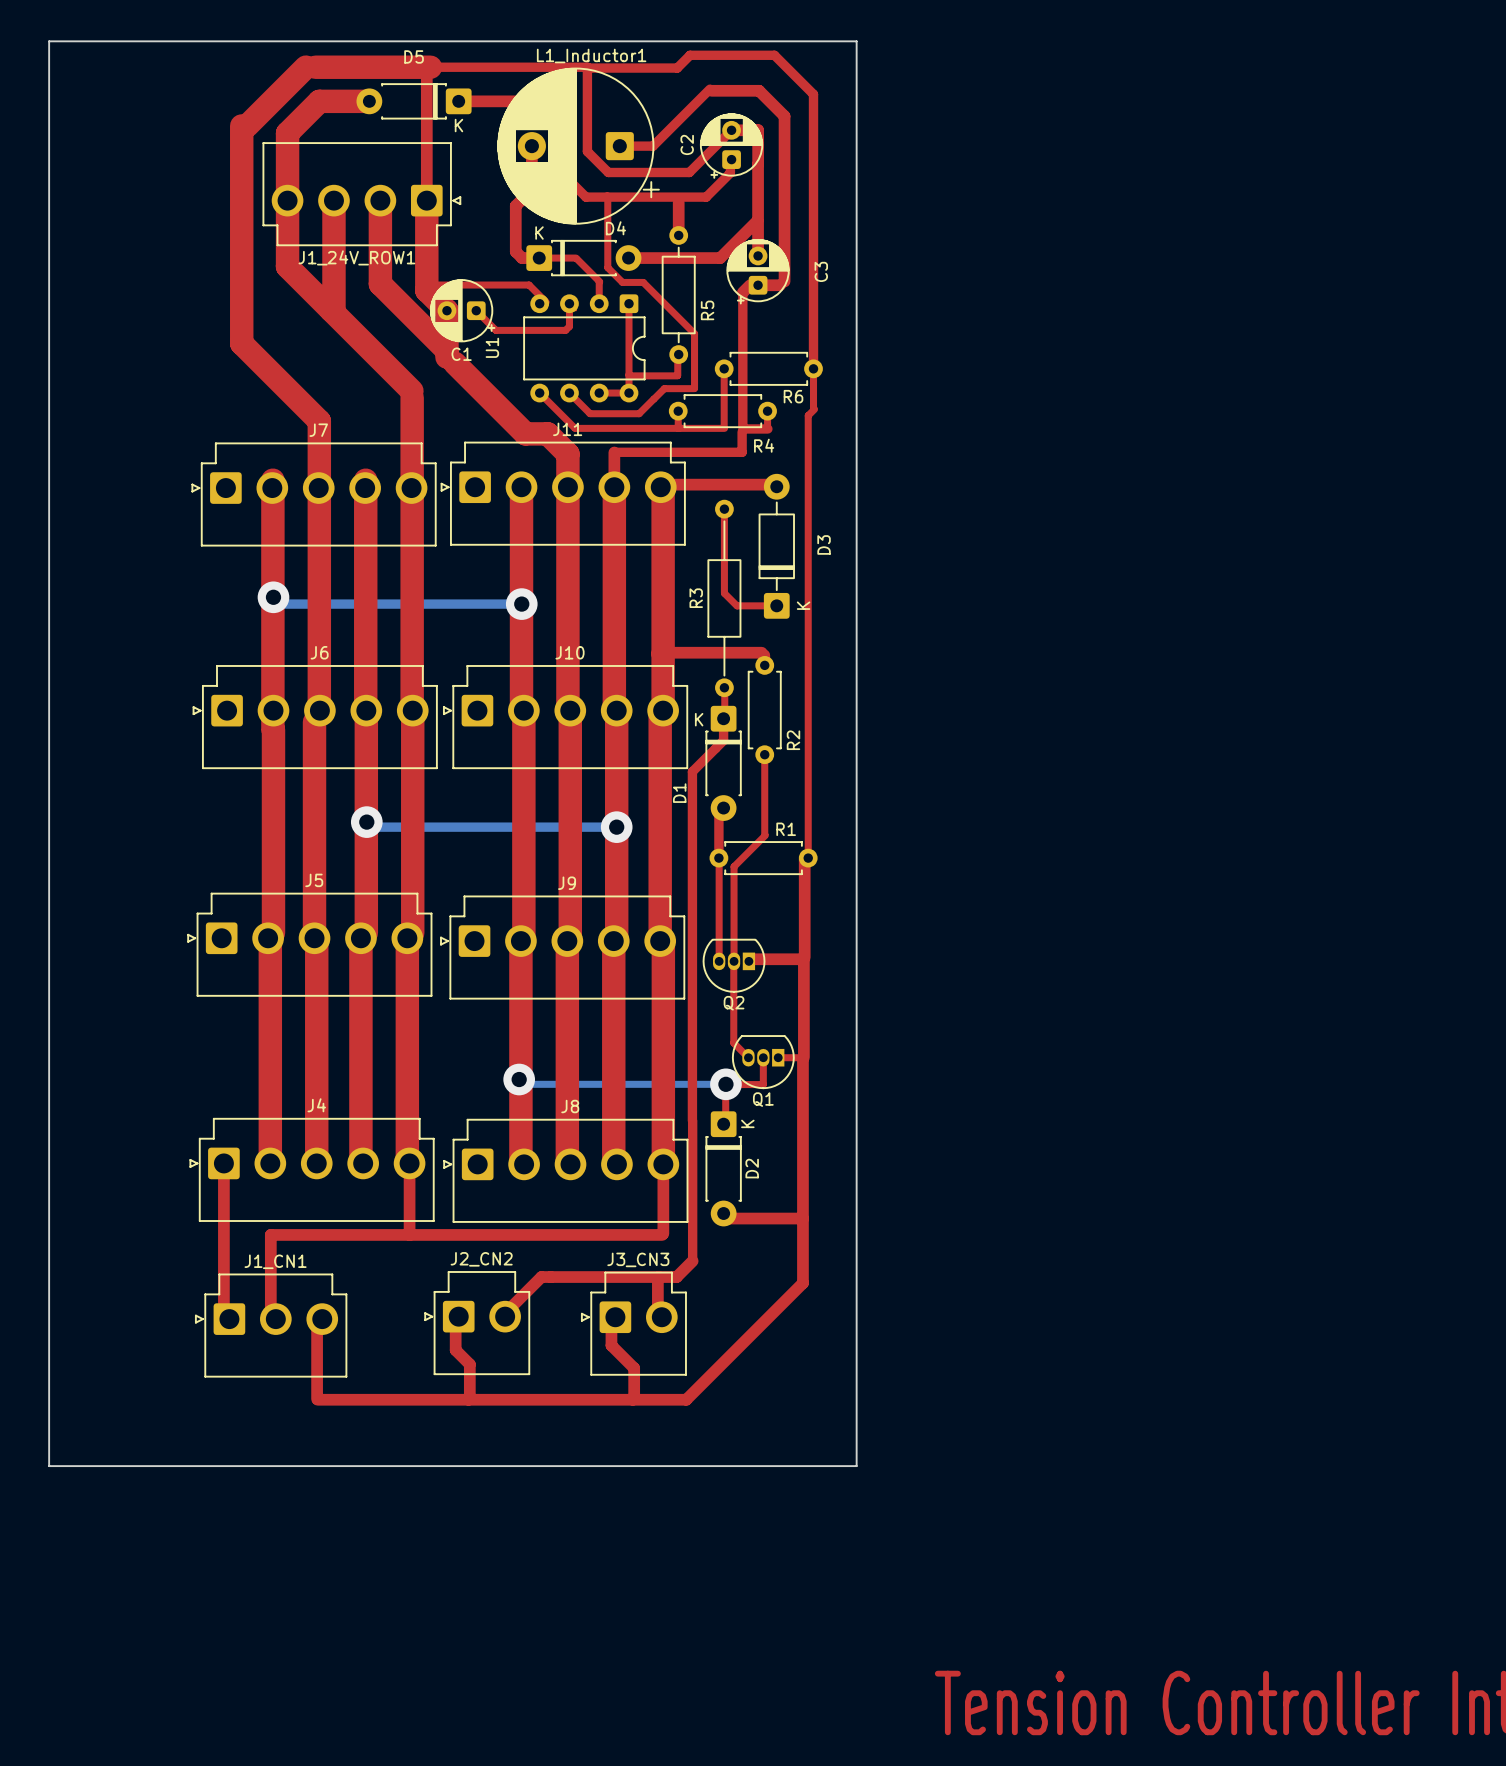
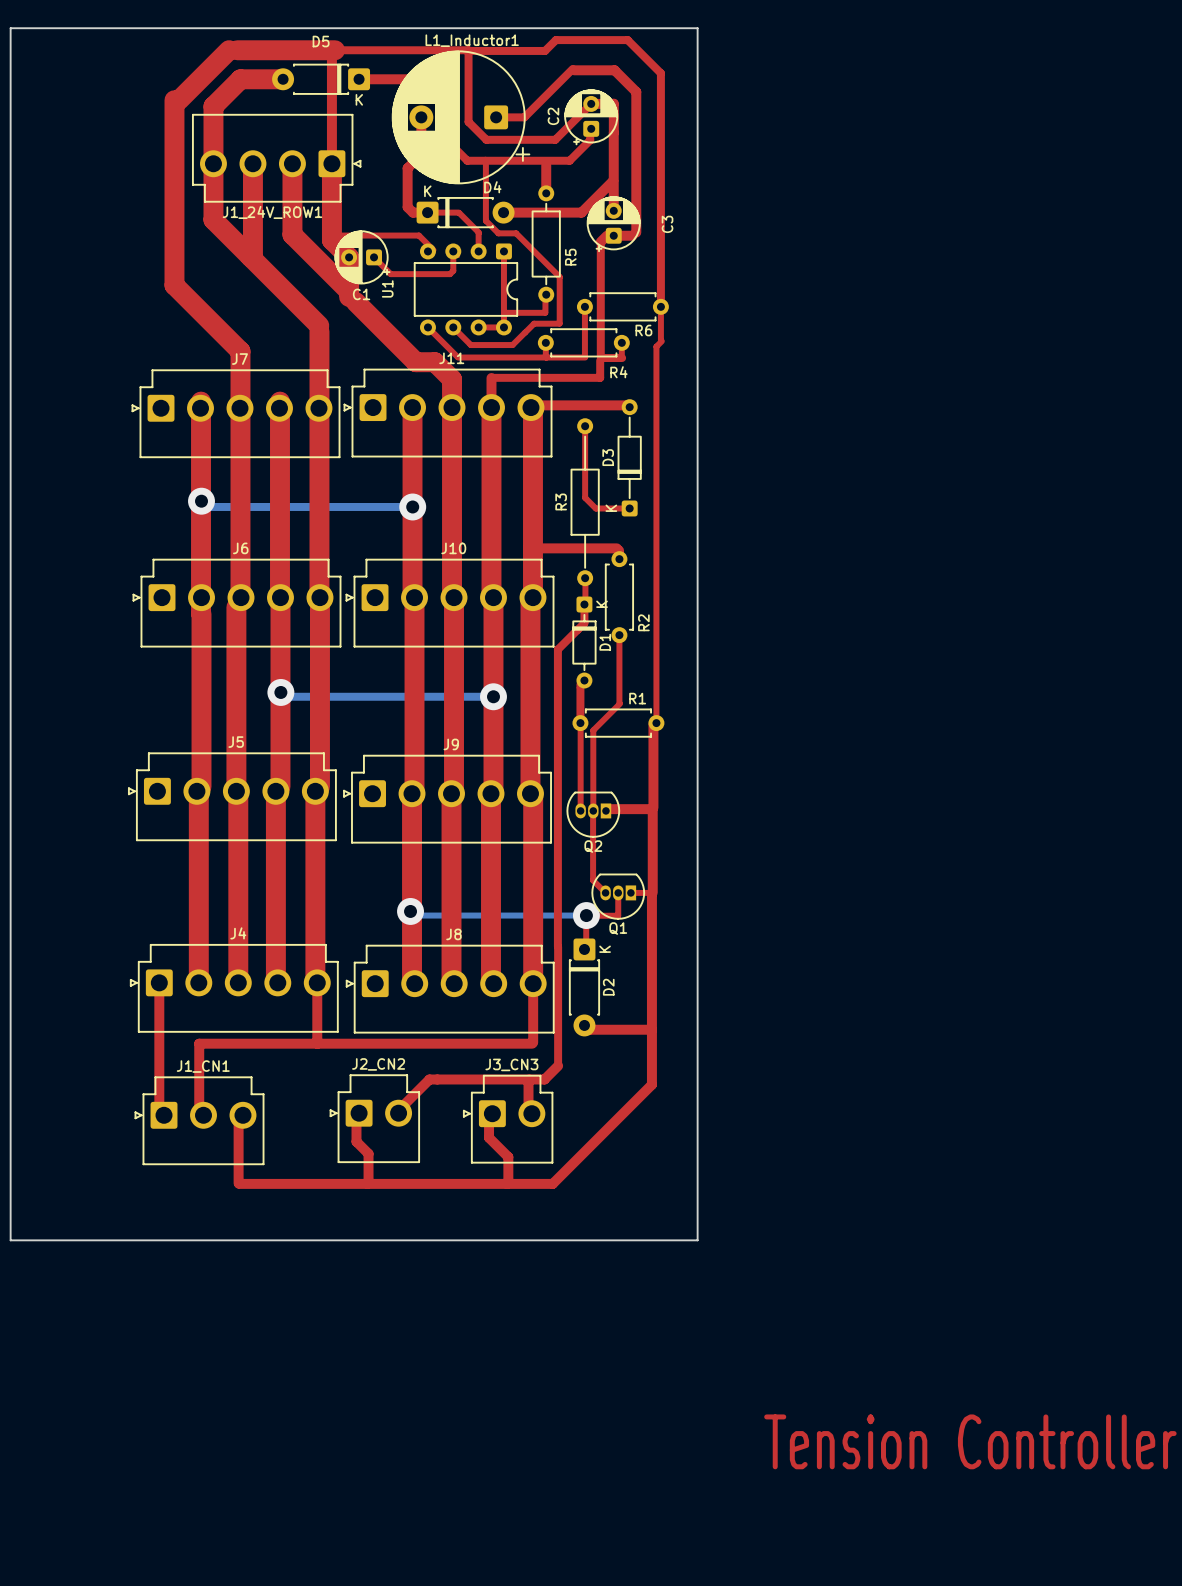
D3 footprint: [758, 473, 795, 619] -> [617, 399, 642, 517]
D3 name position: D3 (824, 544) -> D3 (608, 457)
D1 footprint: [705, 705, 742, 821] -> [572, 596, 597, 689]
D1 name position: D1 (679, 793) -> D1 (605, 642)

